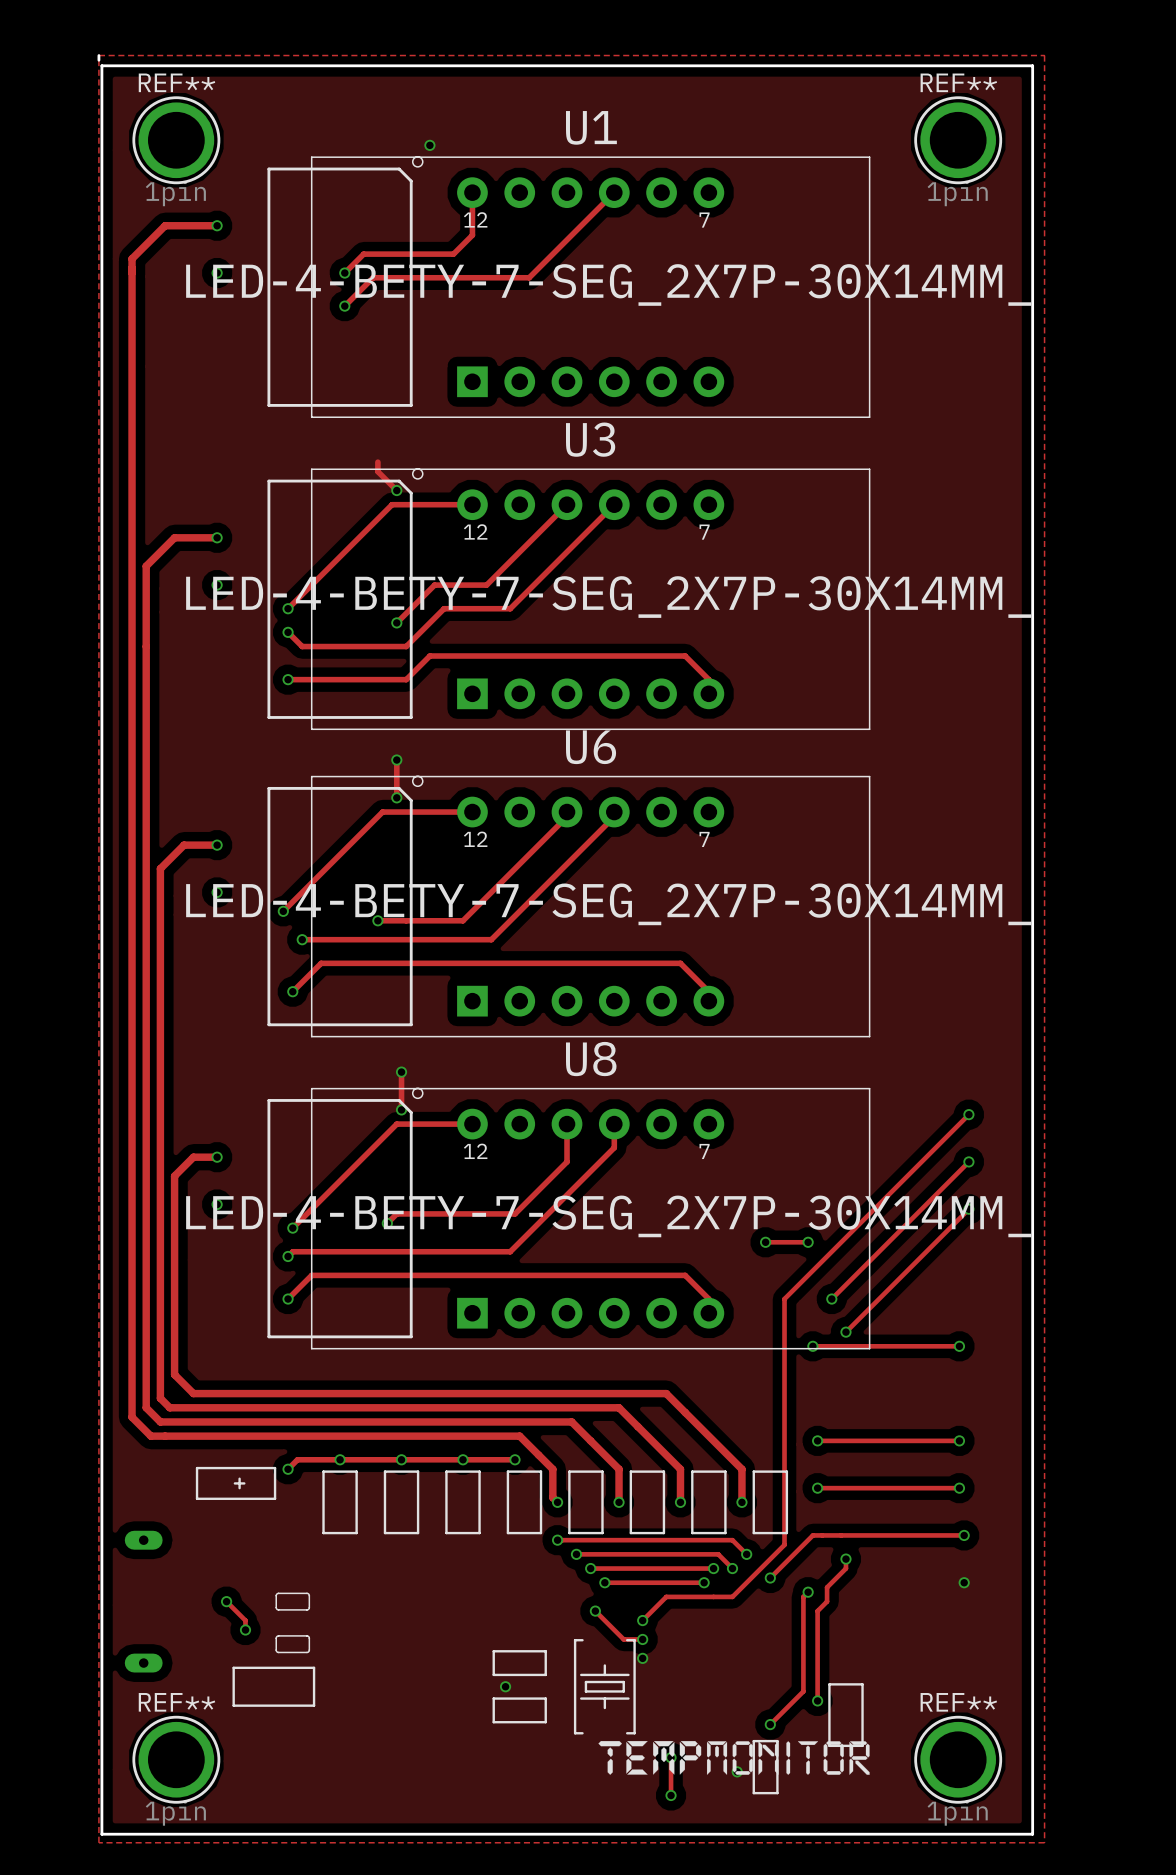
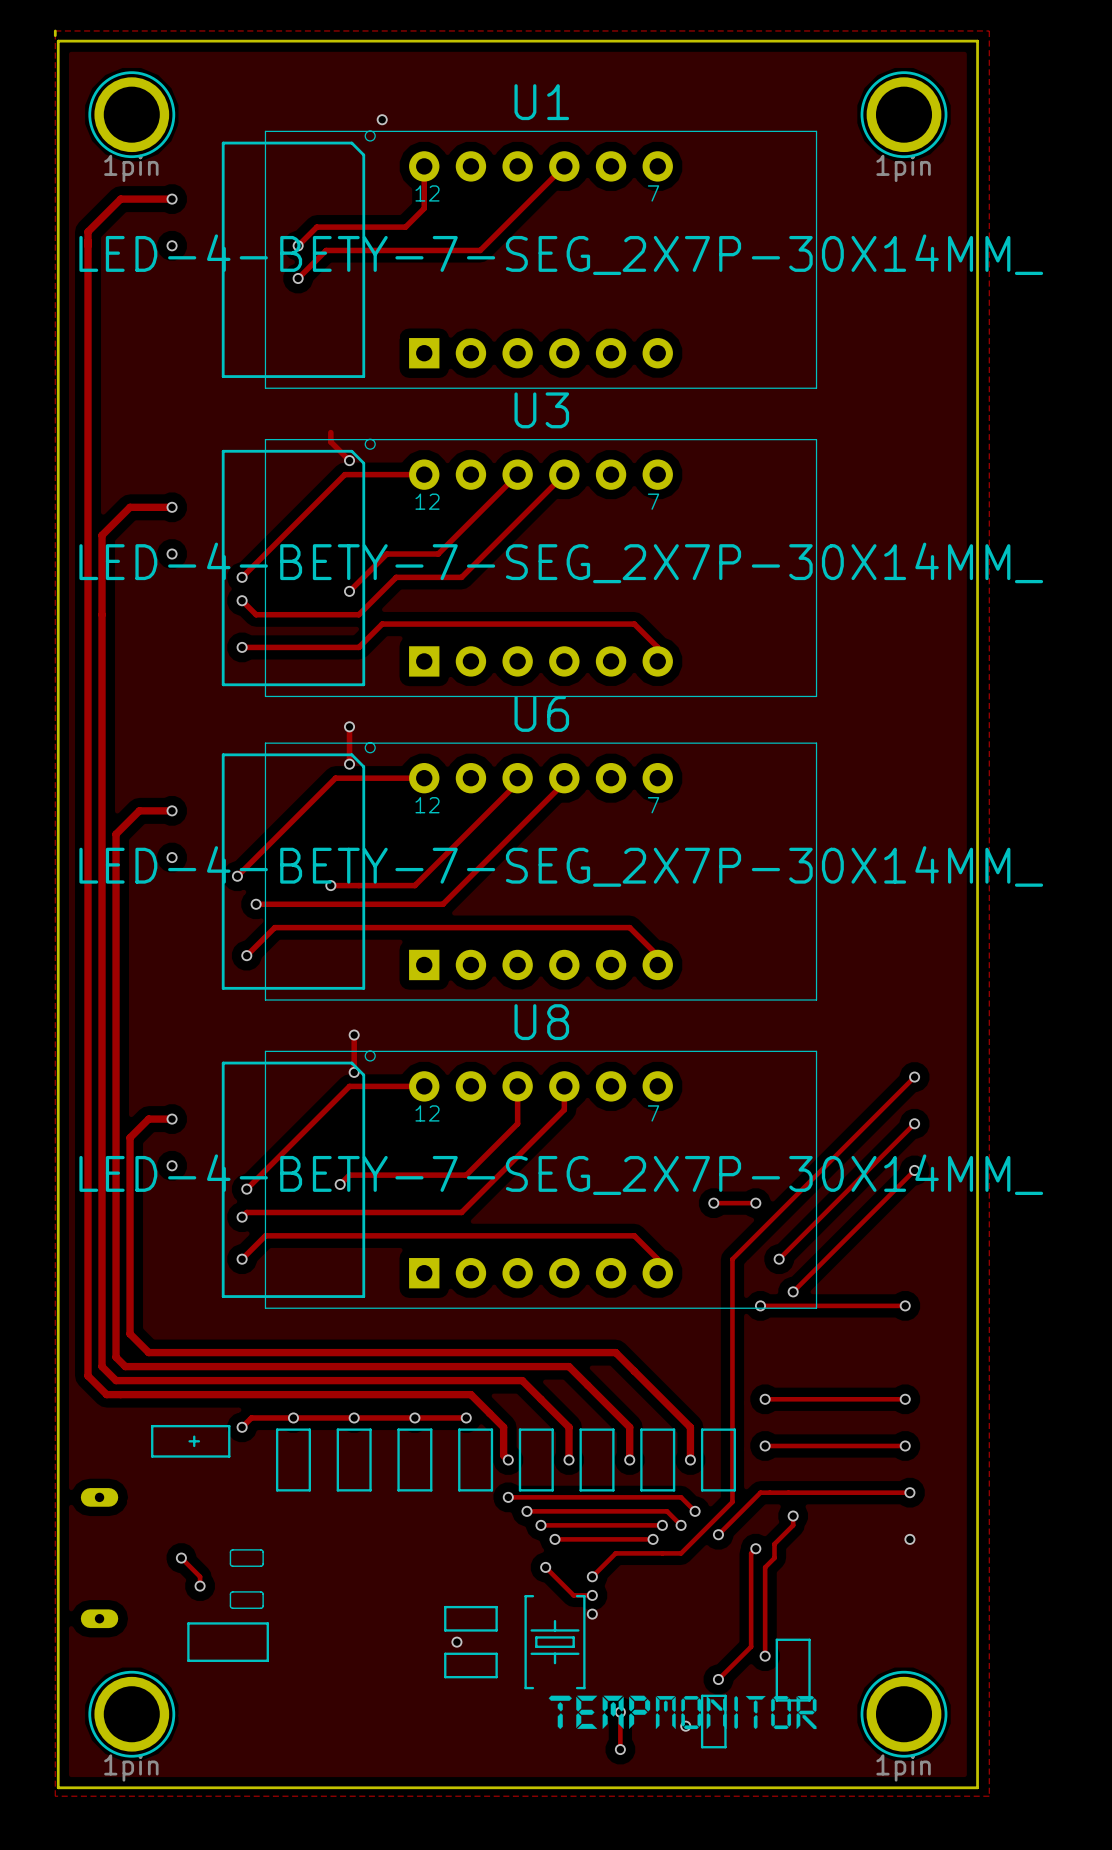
REF** name: REF** (176, 82) -> none
REF** name: REF** (958, 82) -> none
REF** name: REF** (176, 1702) -> none
REF** name: REF** (958, 1702) -> none

